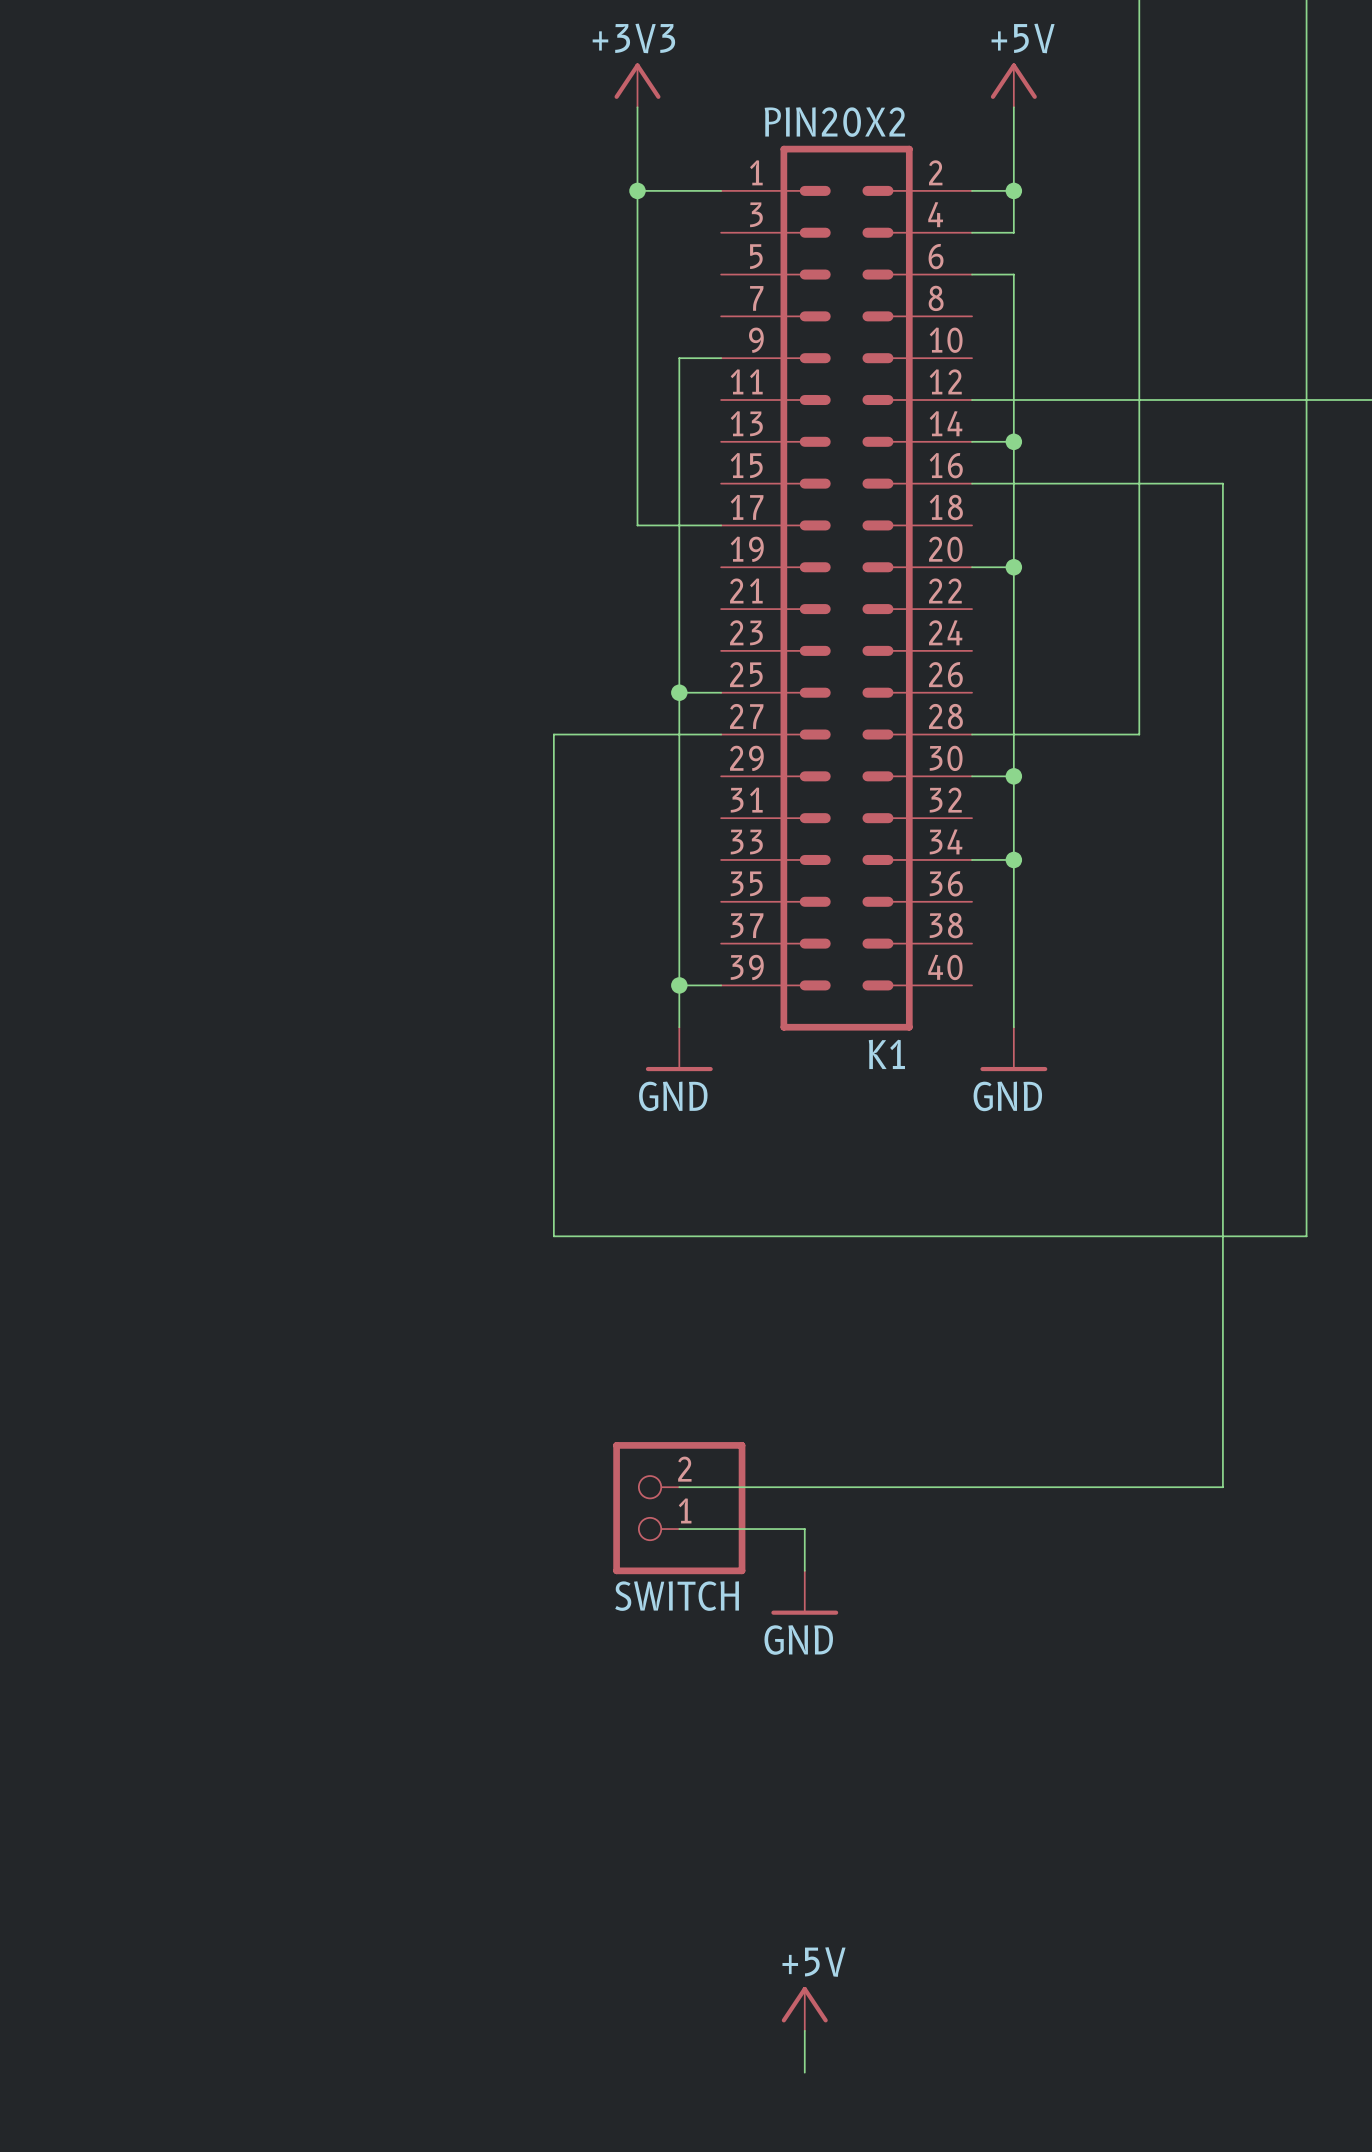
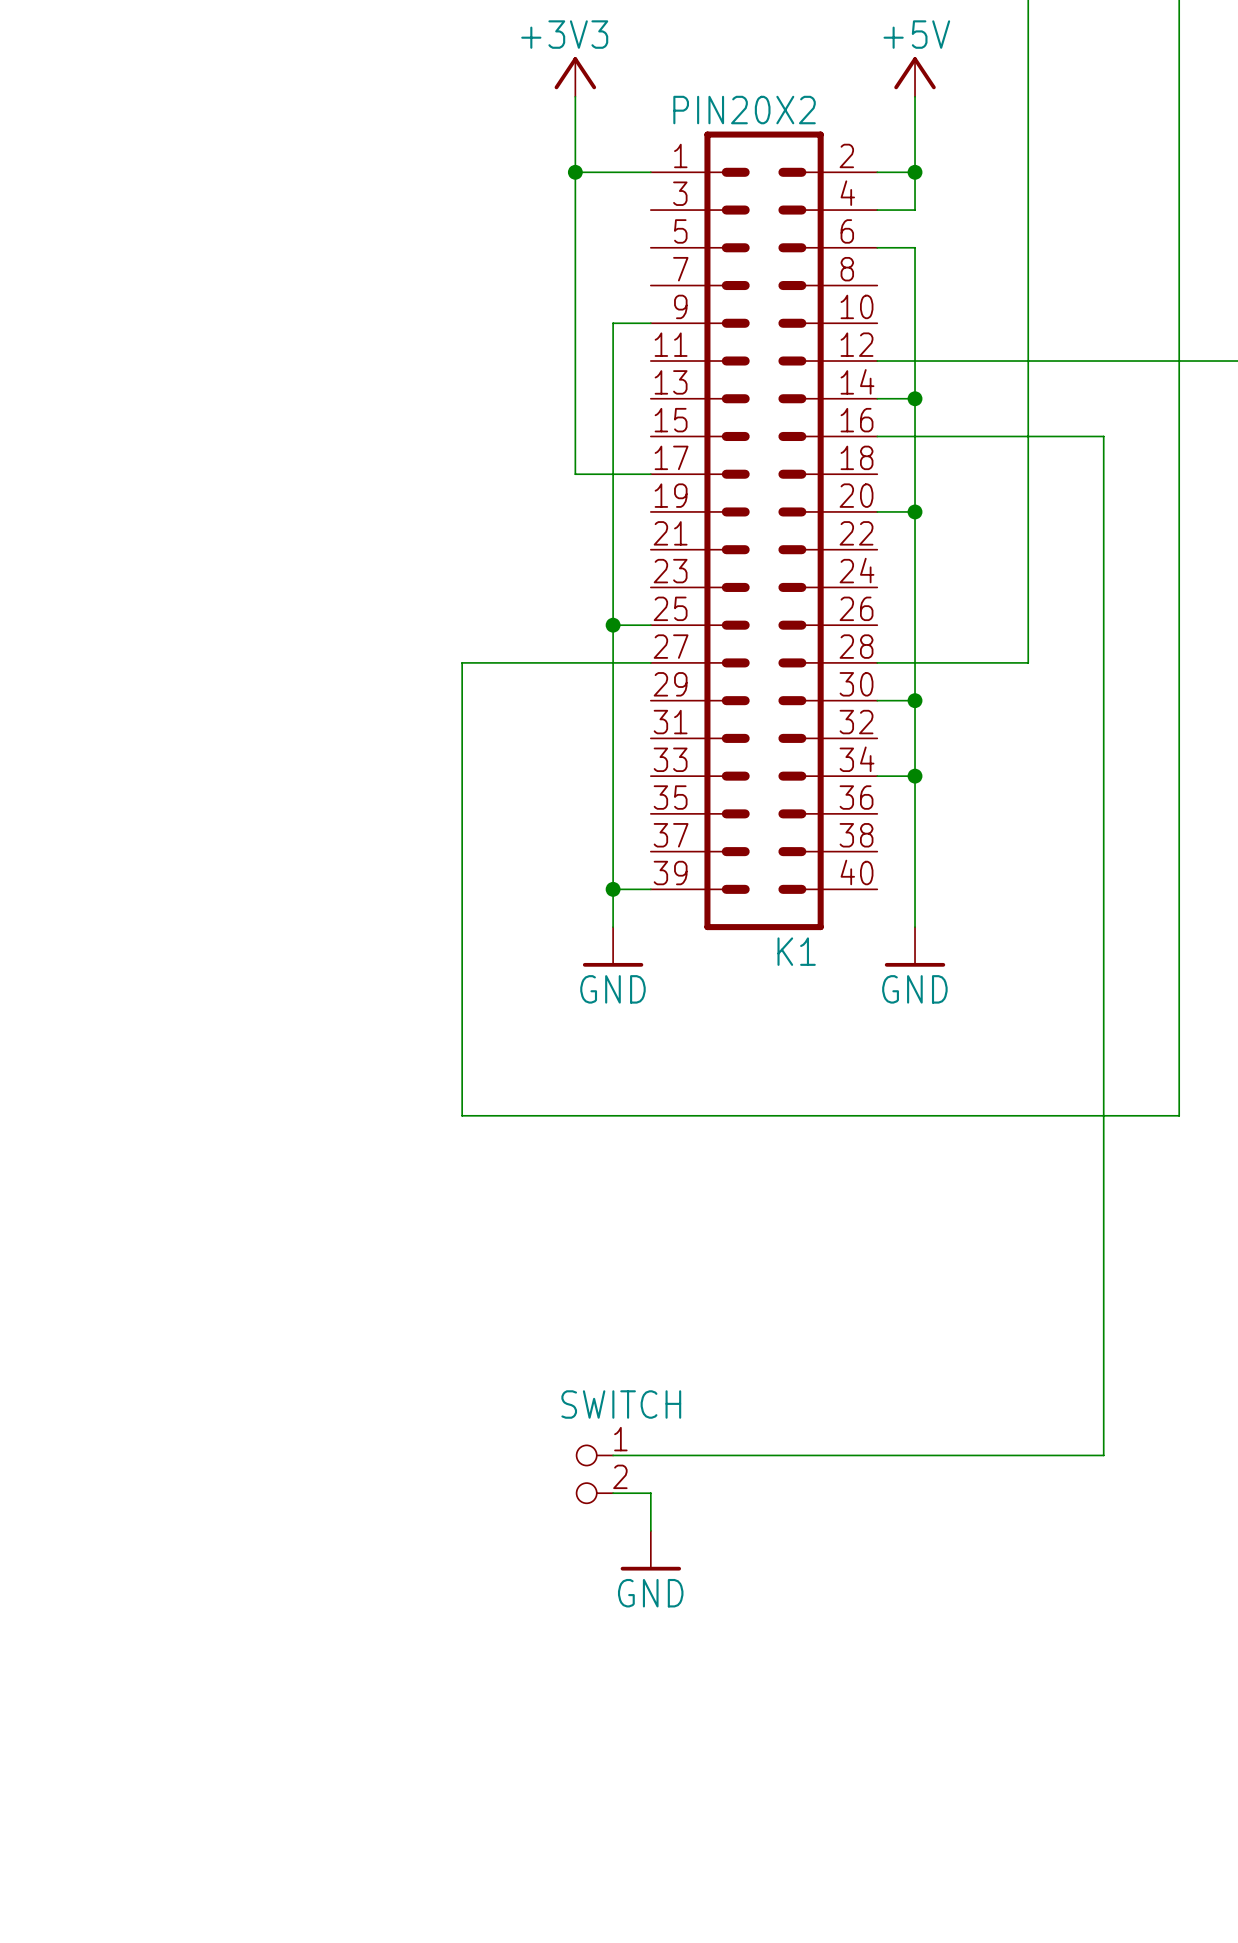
wire: (553, 734) (553, 1236) -> (499, 662) (462, 662) (462, 1115) (499, 1115)
wire: (679, 1487) (1222, 1487) -> (613, 1455) (1103, 1455) (1103, 1342)
SWITCH: (679, 1508) -> none
wire: (679, 1529) (804, 1529) (804, 1570) -> none
power symbol position: GND (804, 1592) -> GND (650, 1550)
SWITCH: none -> (594, 1474)
wire: none -> (613, 1493) (650, 1493) (650, 1530)
power symbol: +5V (804, 2008) -> none
wire: (804, 2030) (804, 2072) -> none

